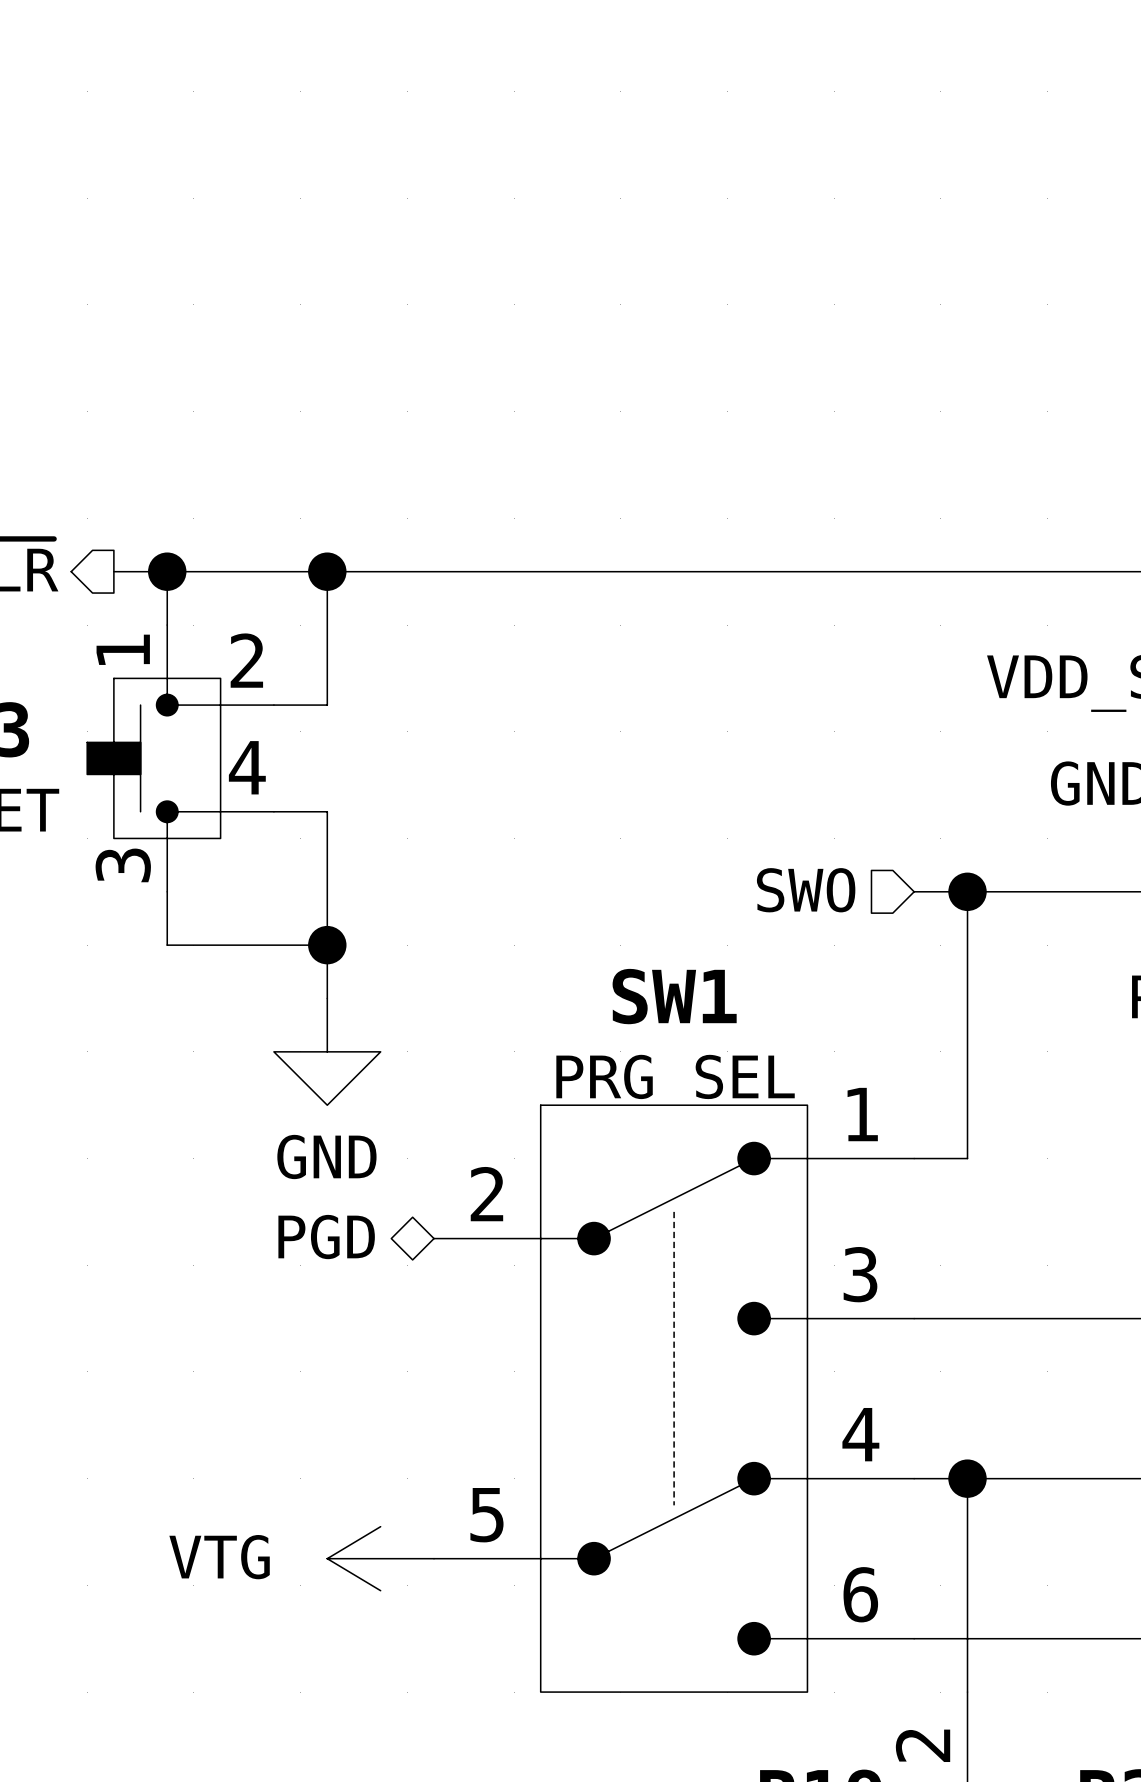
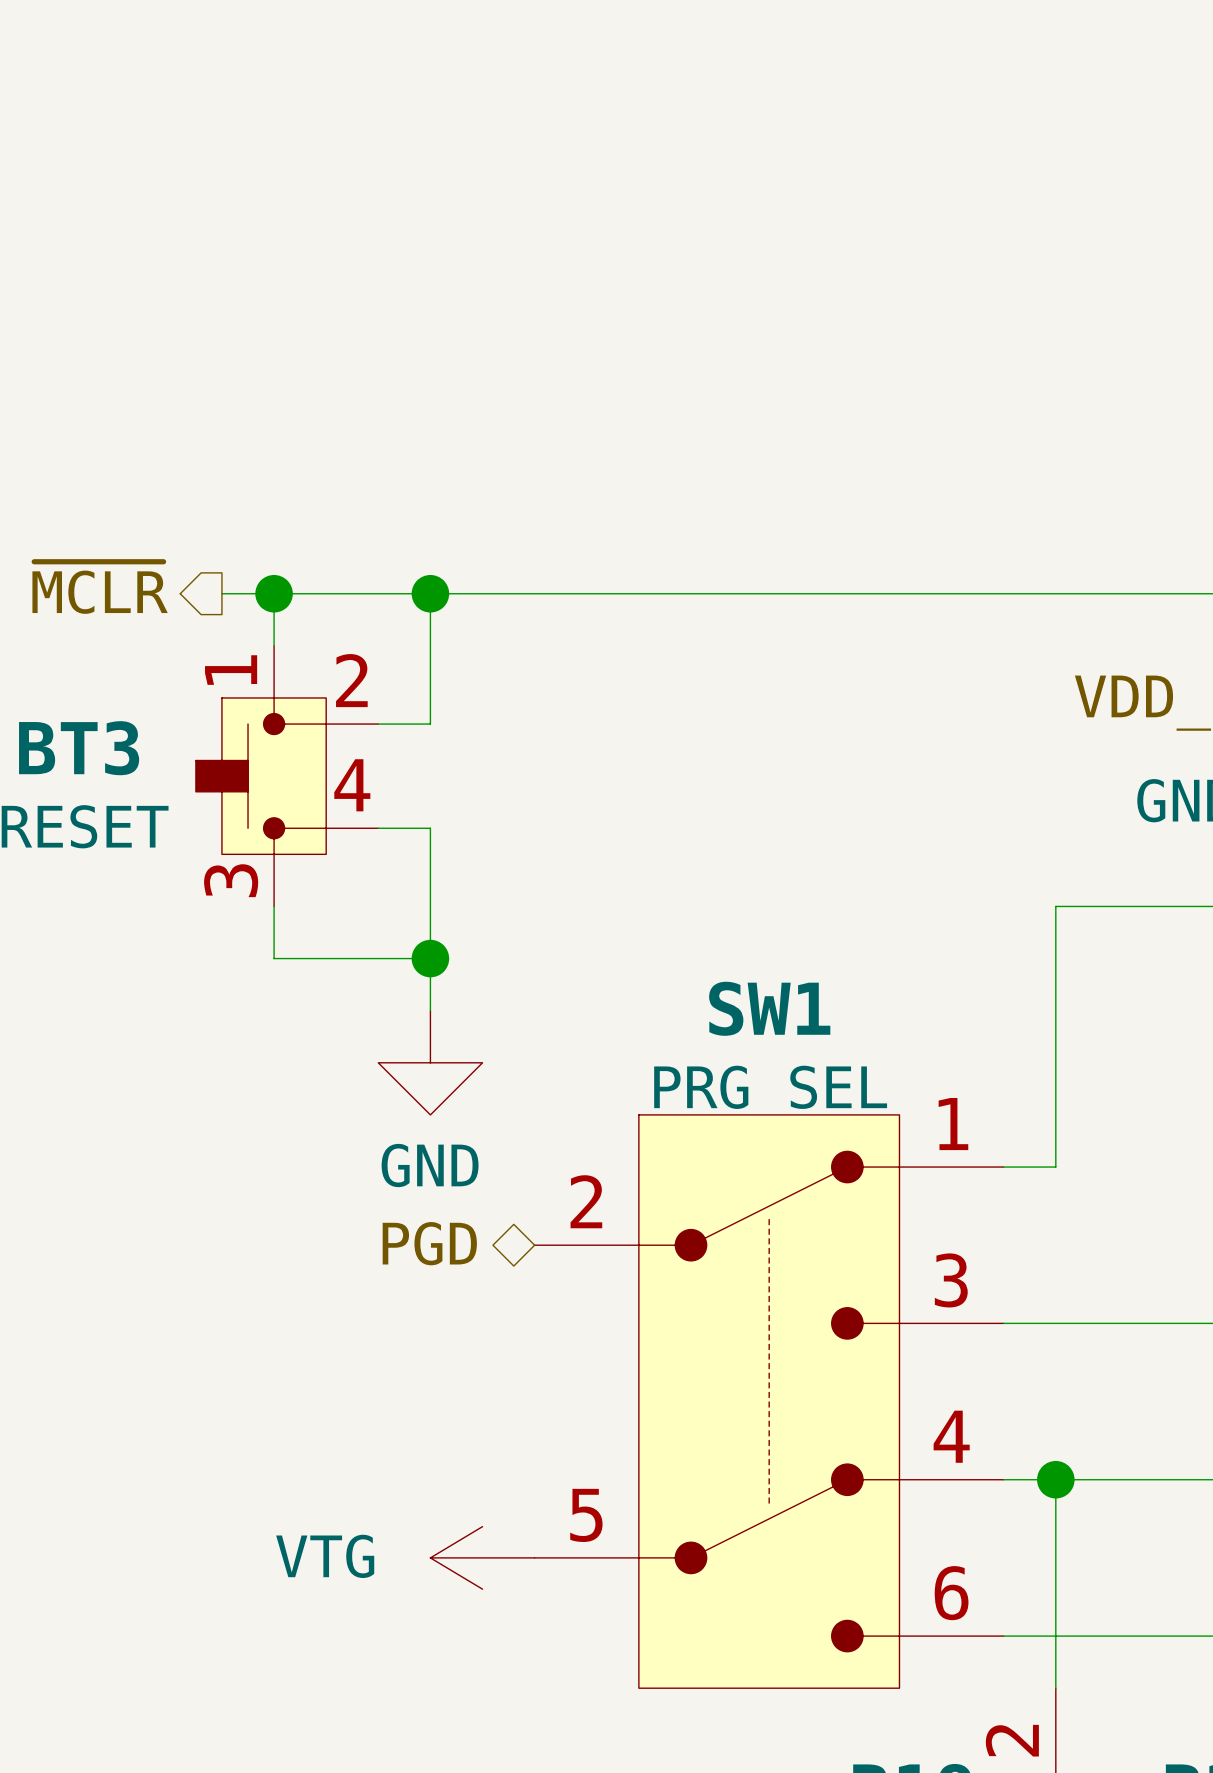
hierarchical label: SWO (806, 890) -> none
wire: (914, 891) (967, 891) -> none
junction: (967, 891) -> none

